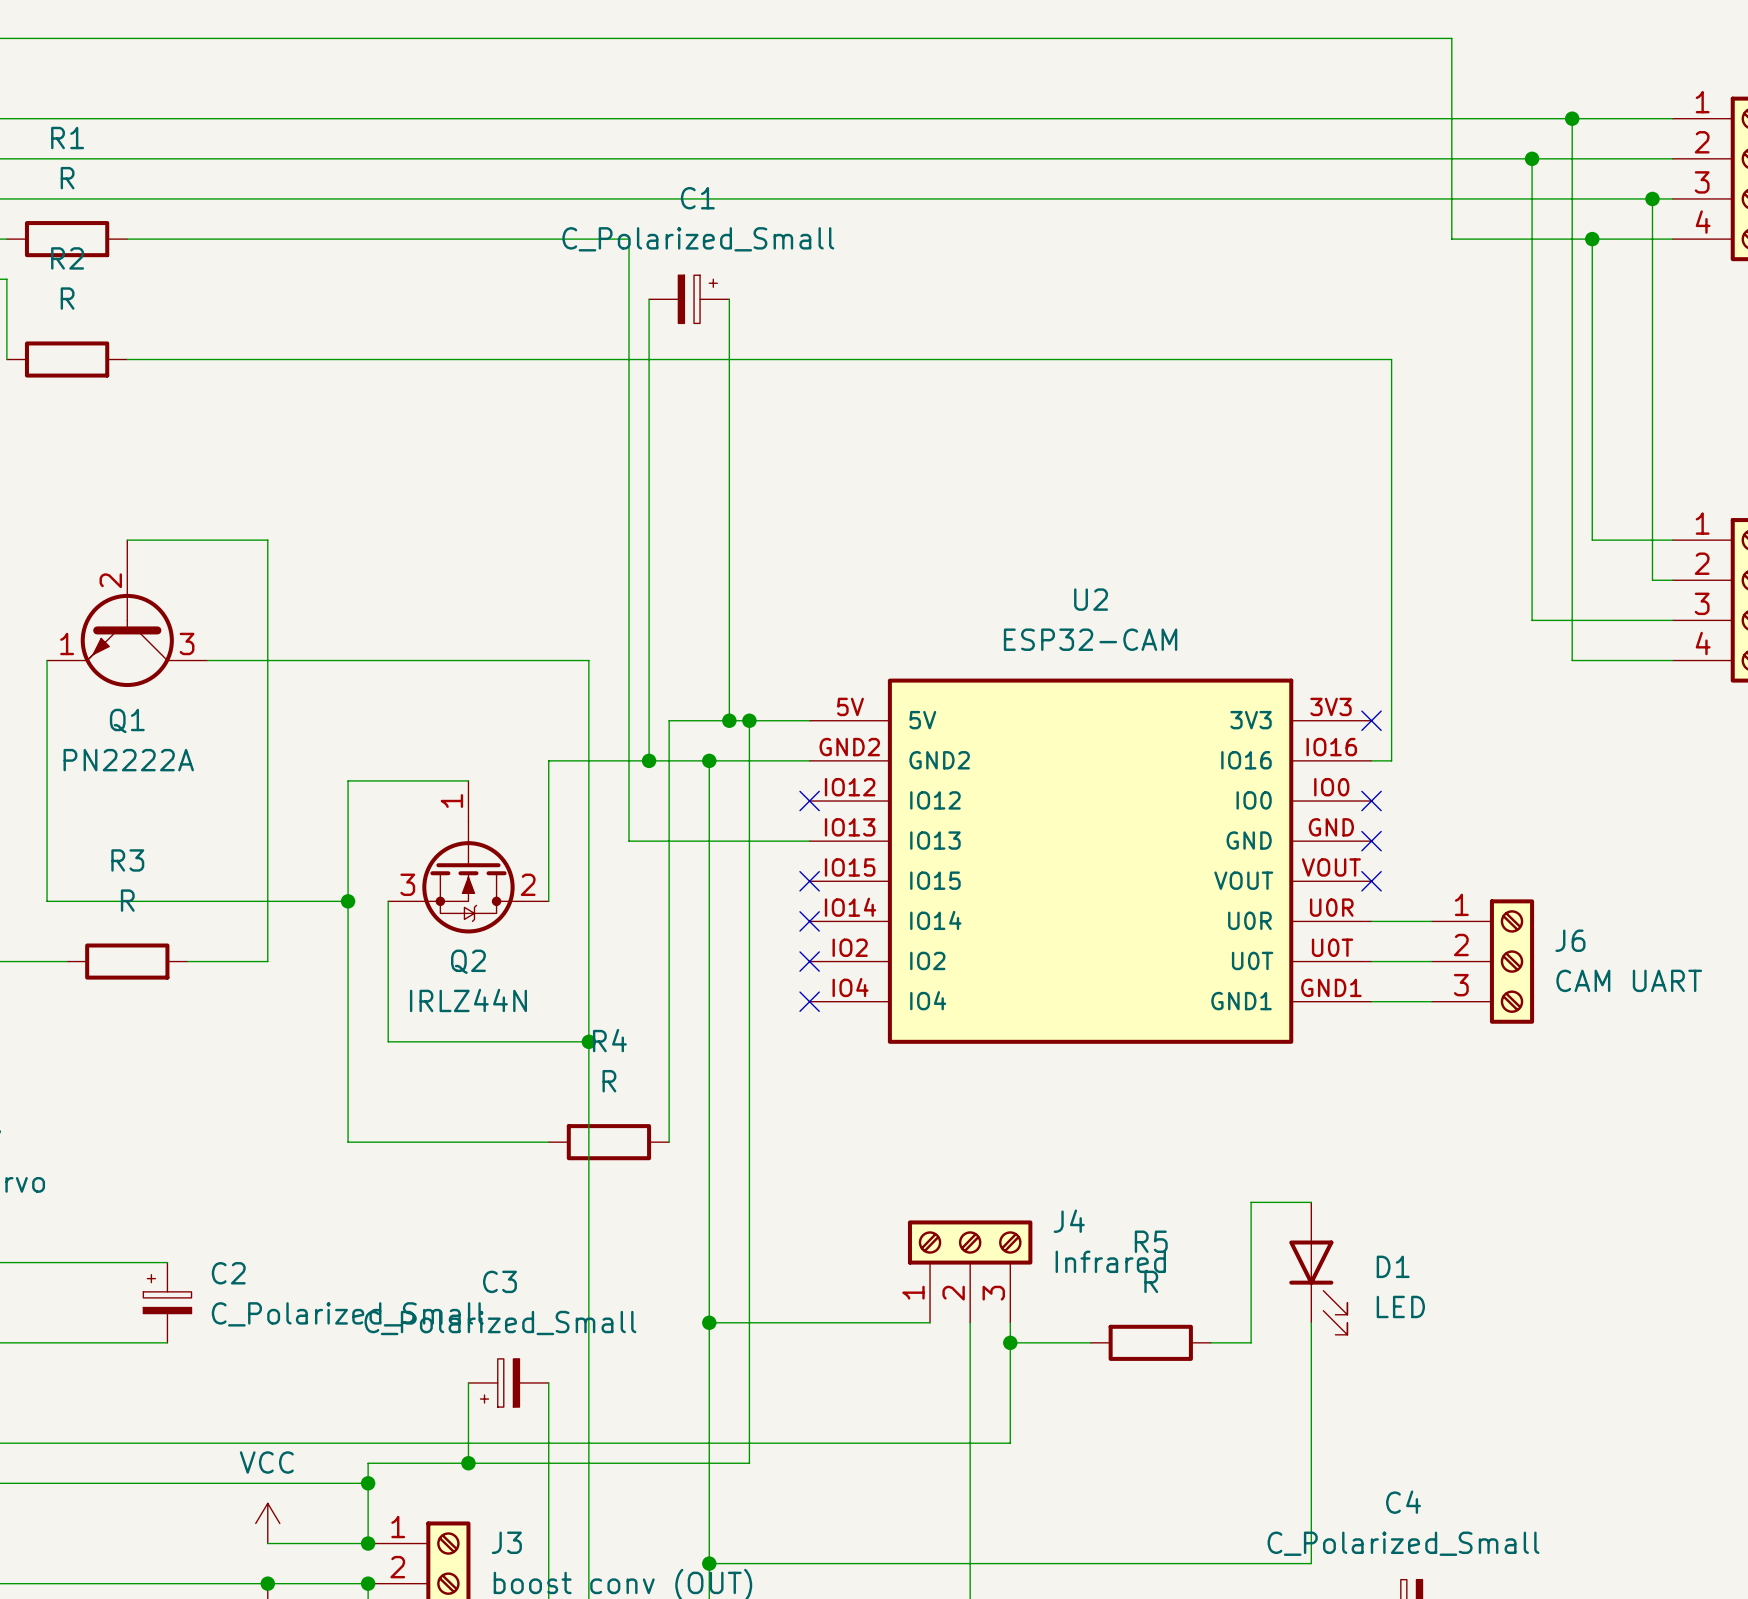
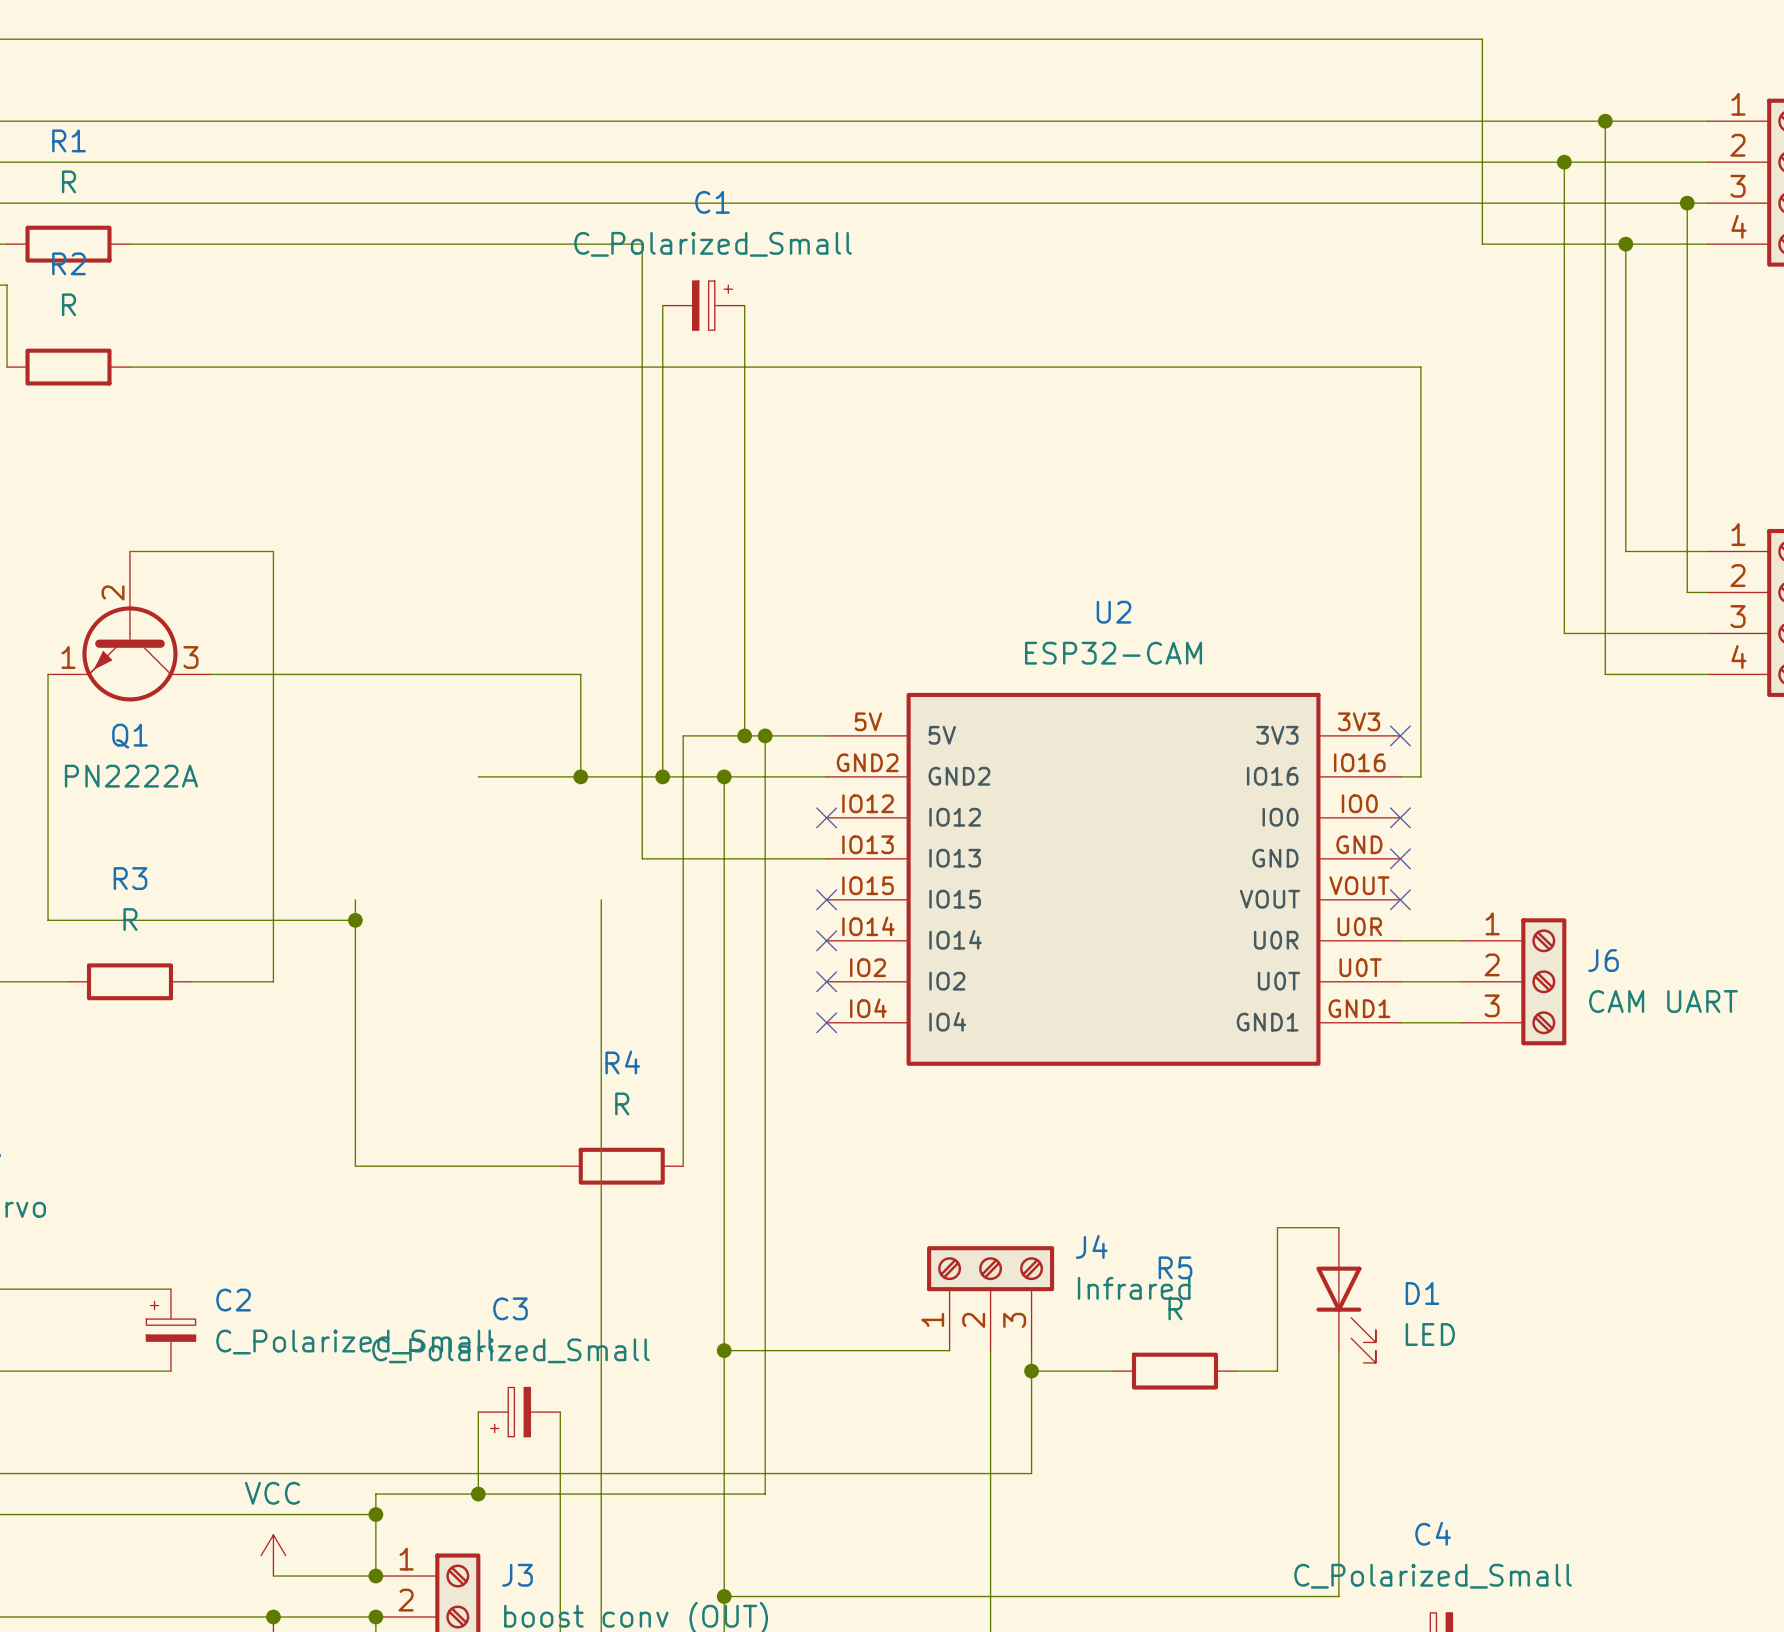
wire: (568, 660) (588, 660) (588, 881) -> (580, 674) (580, 776)
wire: (548, 760) (548, 901) -> (560, 776) (478, 776)
junction: none -> (580, 776)
wire: (468, 780) (348, 780) (348, 881) -> none
Q2: IRLZ44N (468, 857) -> none
wire: (388, 901) (388, 1041) (588, 1041) -> none
junction: (588, 1041) -> none

